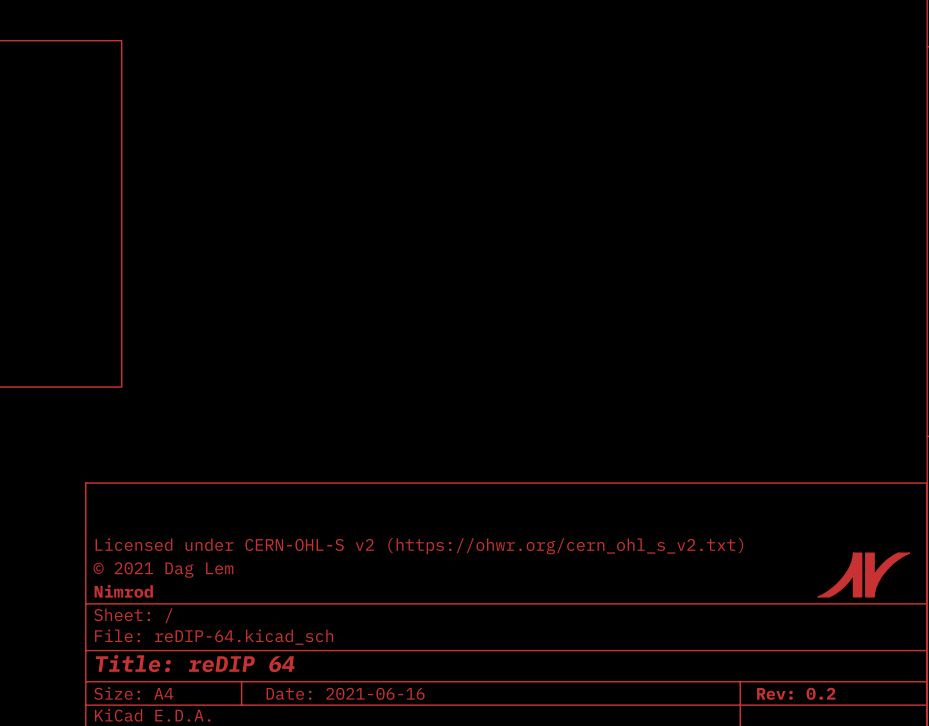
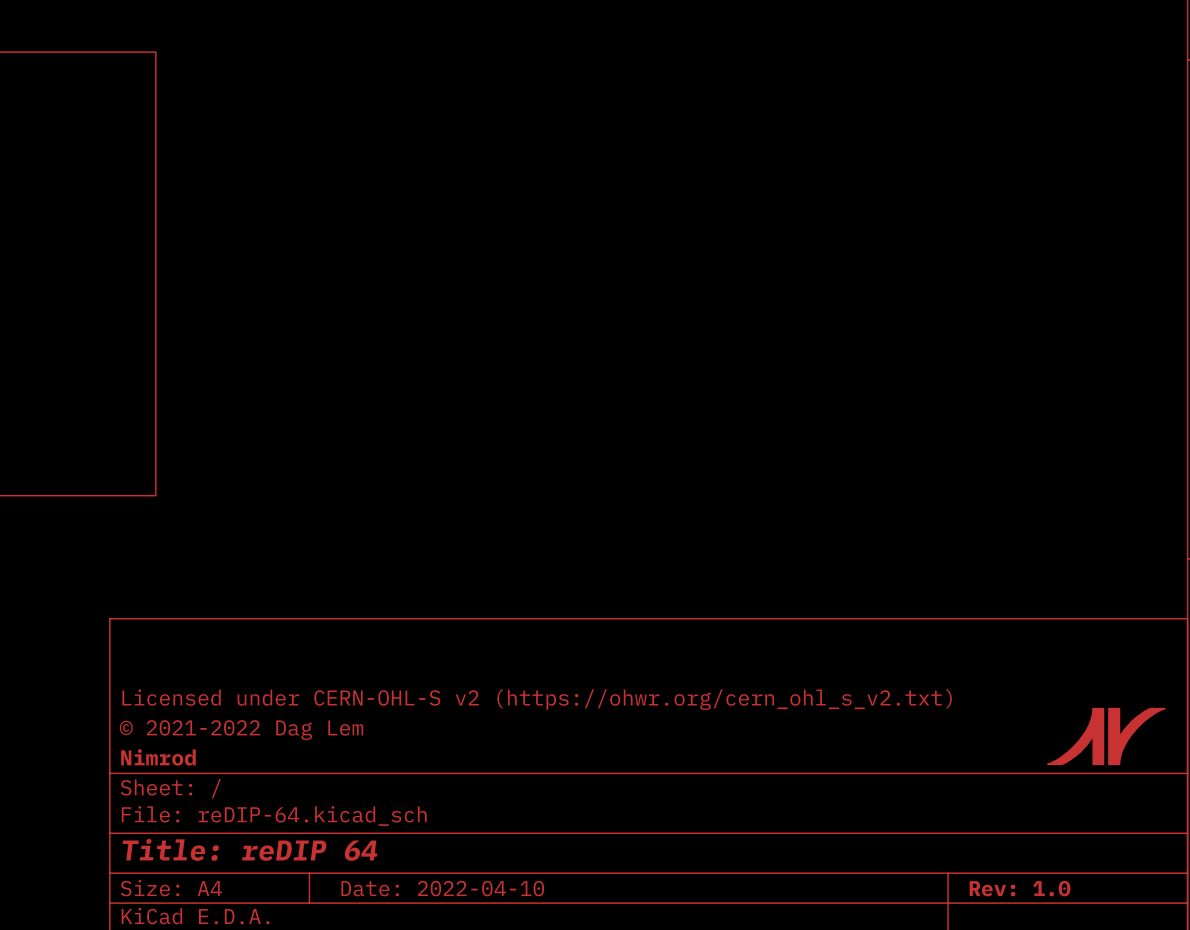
title block: © 2021 Dag Lem (163, 570) -> © 2021-2022 Dag Lem (241, 730)
title block: Date: 2021-06-16 (345, 693) -> Date: 2022-04-10 (442, 888)
title block: Rev: 0.2 (796, 693) -> Rev: 1.0 (1020, 888)

